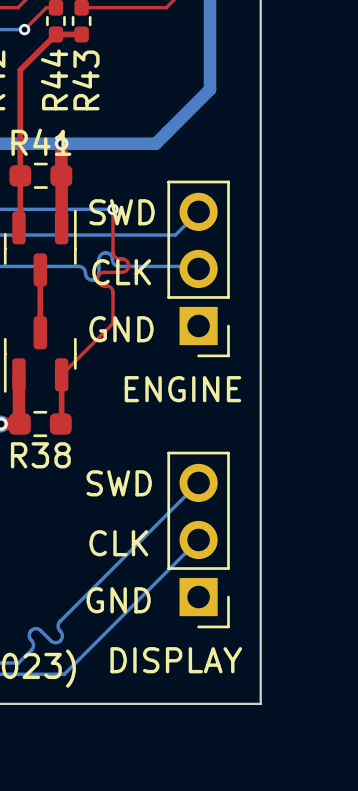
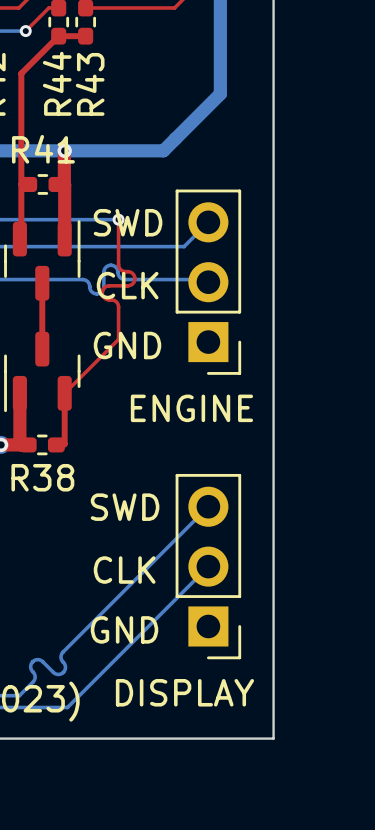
R41 footprint: [9, 162, 73, 189] -> [20, 174, 66, 195]
R38 footprint: [8, 410, 72, 438] -> [19, 434, 65, 456]

